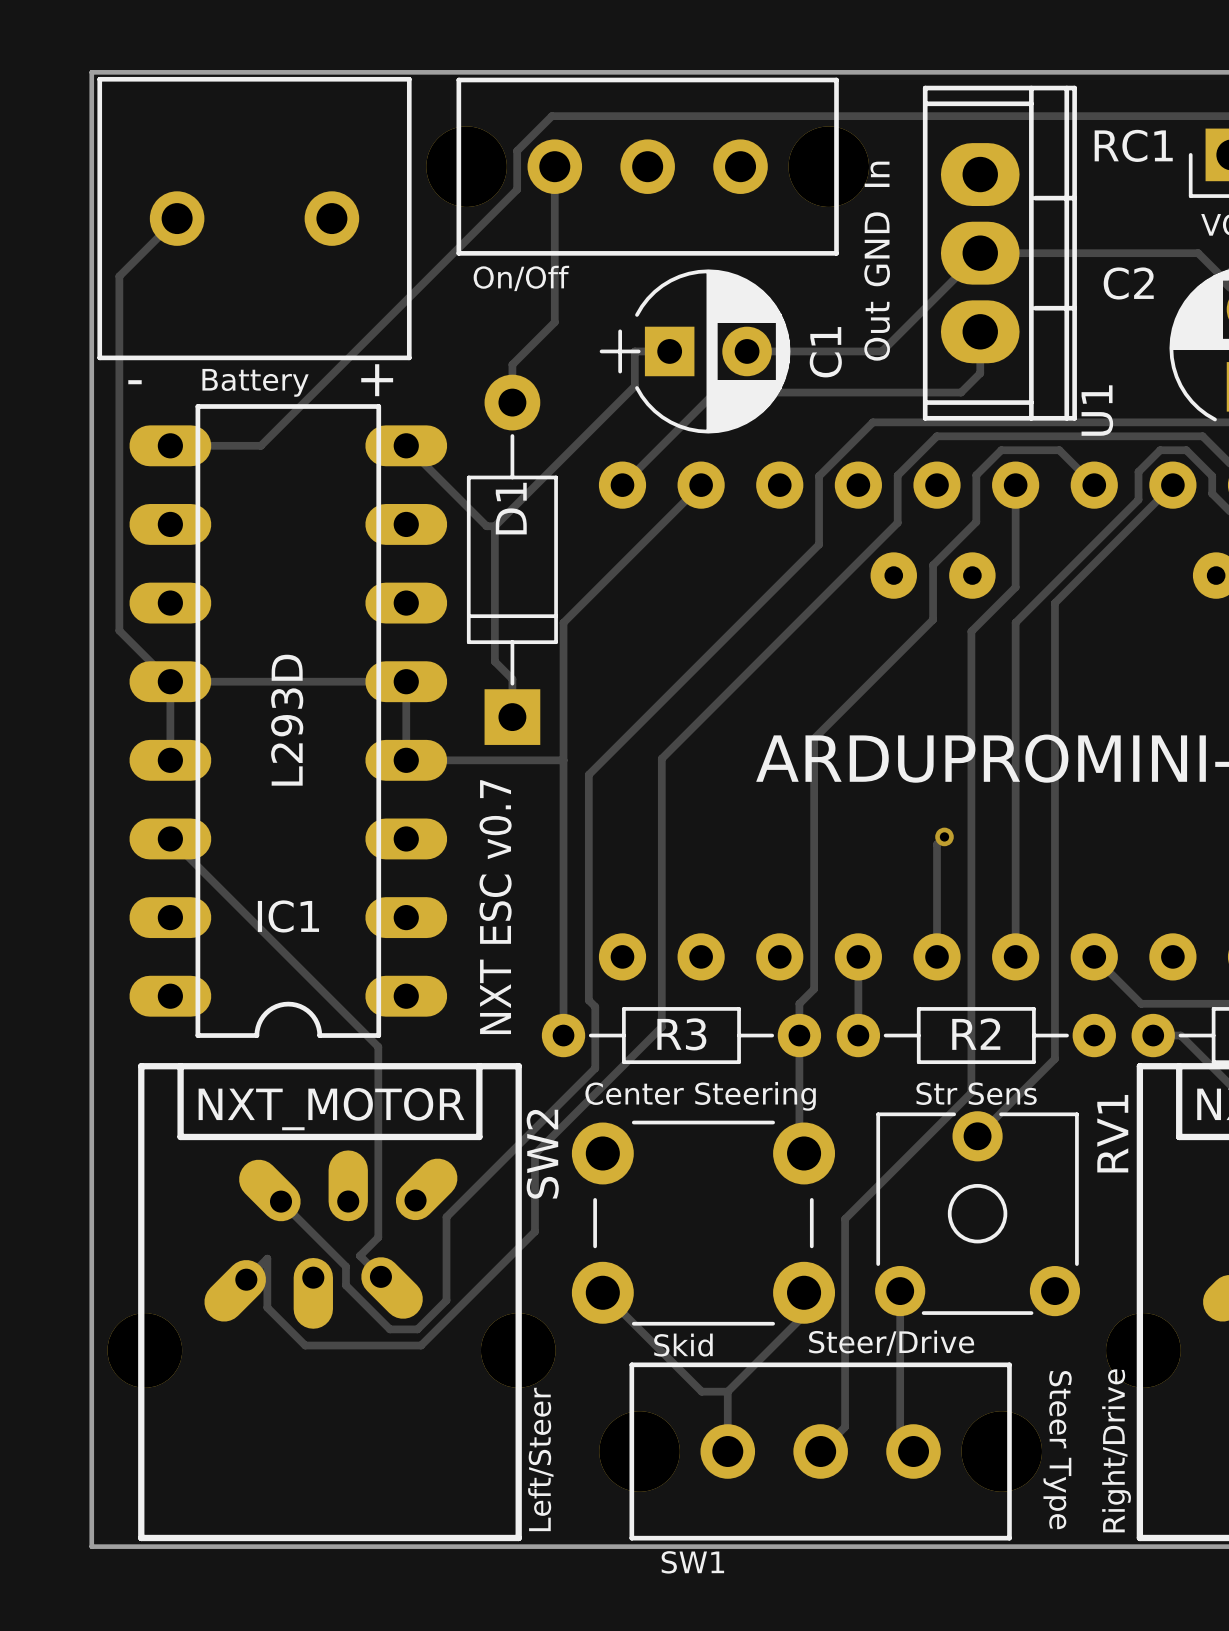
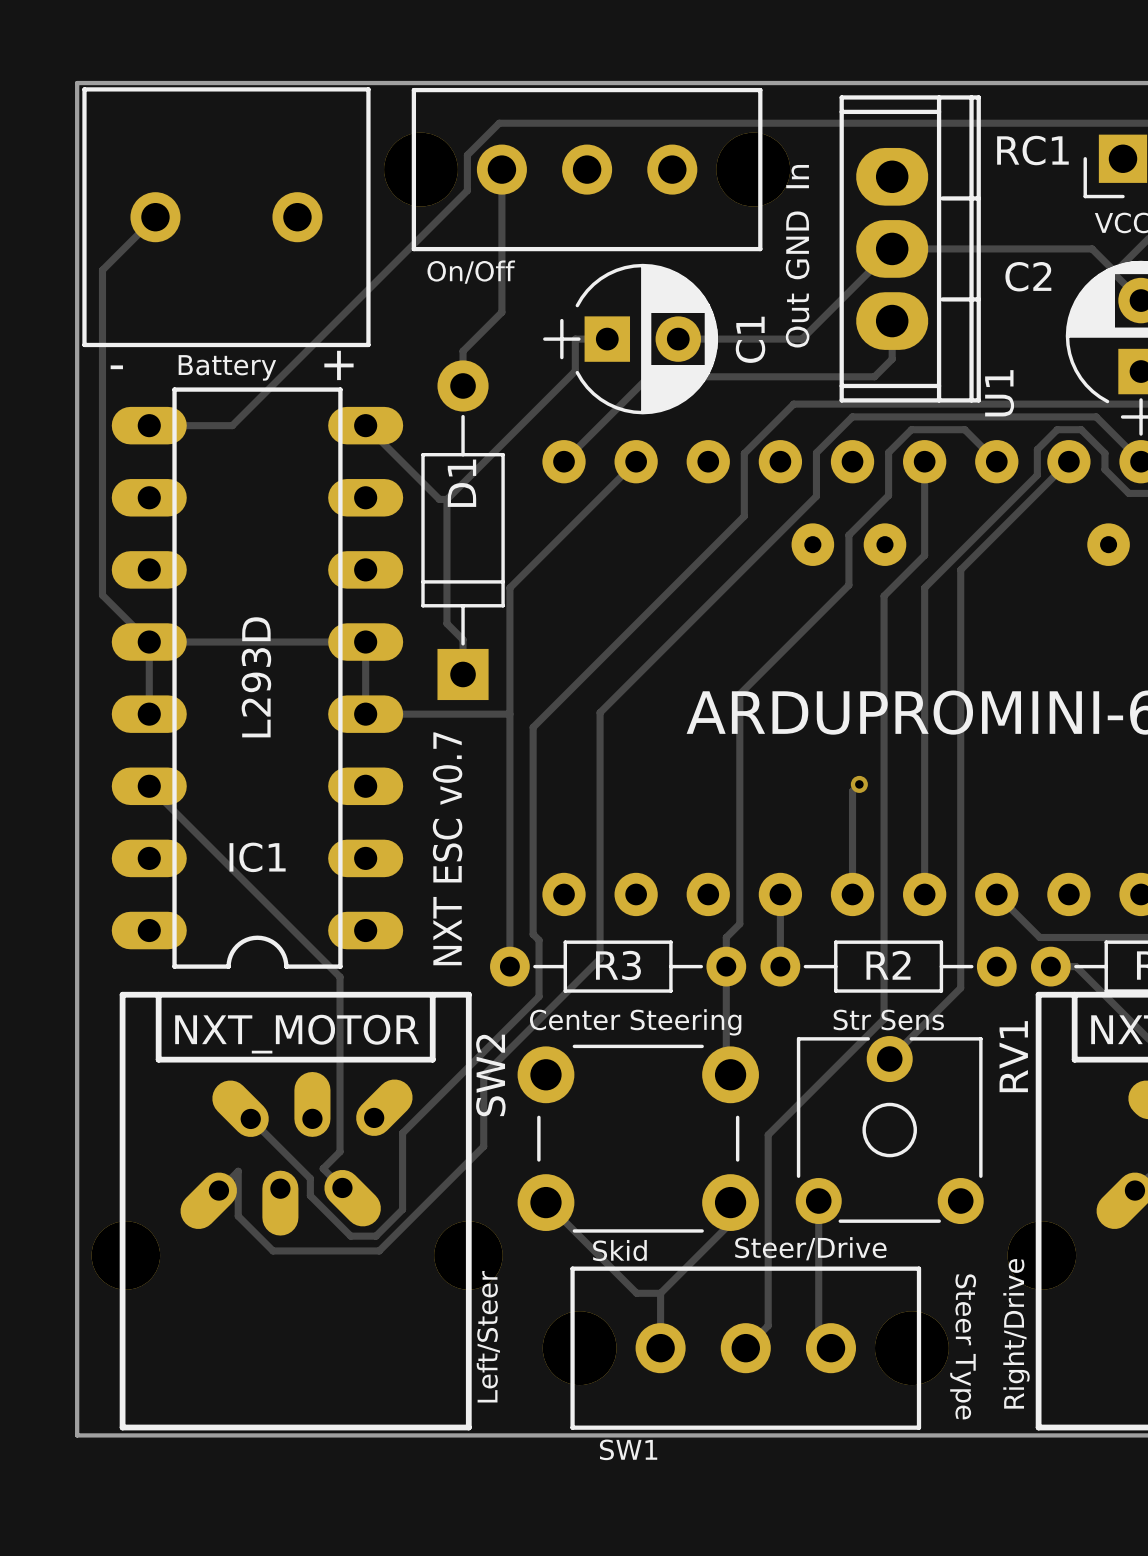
text position: Right/Drive (1116, 1450) -> Right/Drive (1016, 1333)
text position: Left/Steer (540, 1459) -> Left/Steer (488, 1336)

